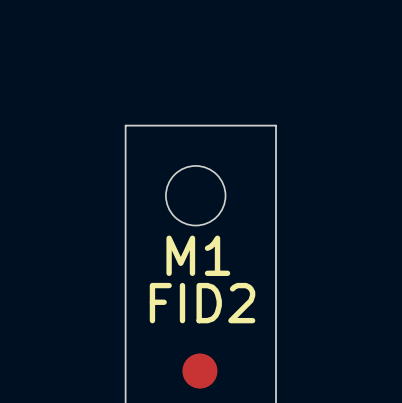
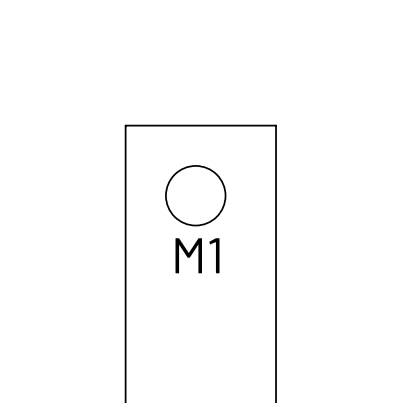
FID2: (199, 371) -> none

